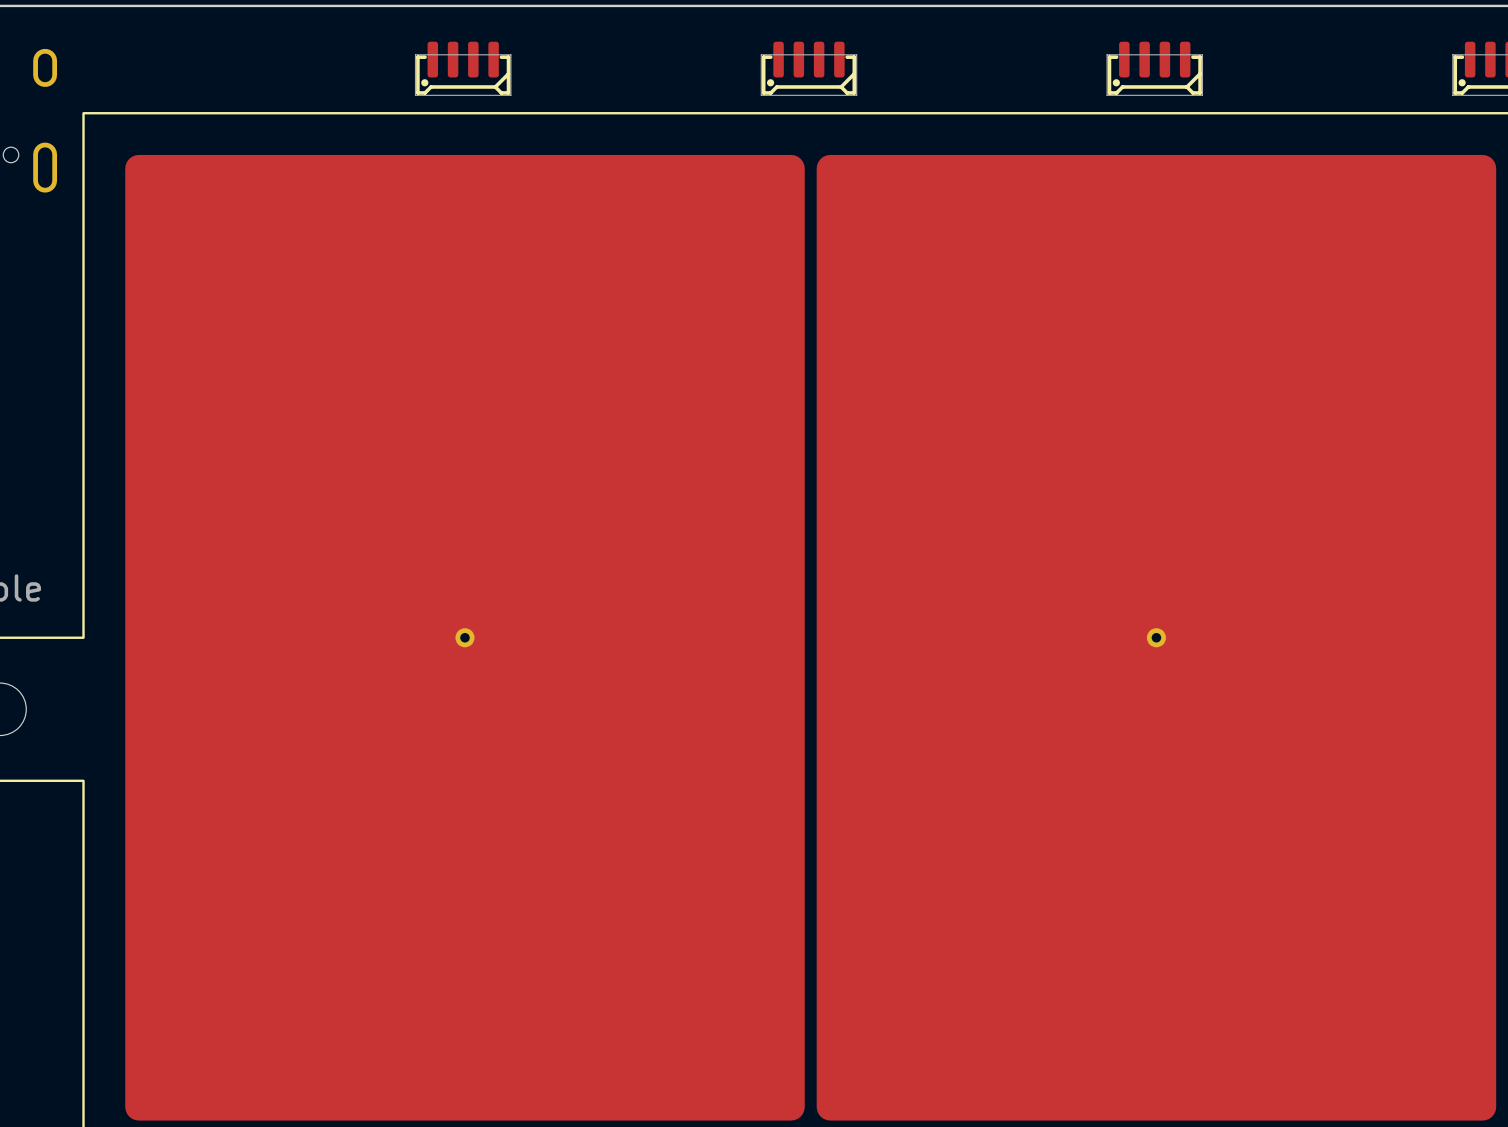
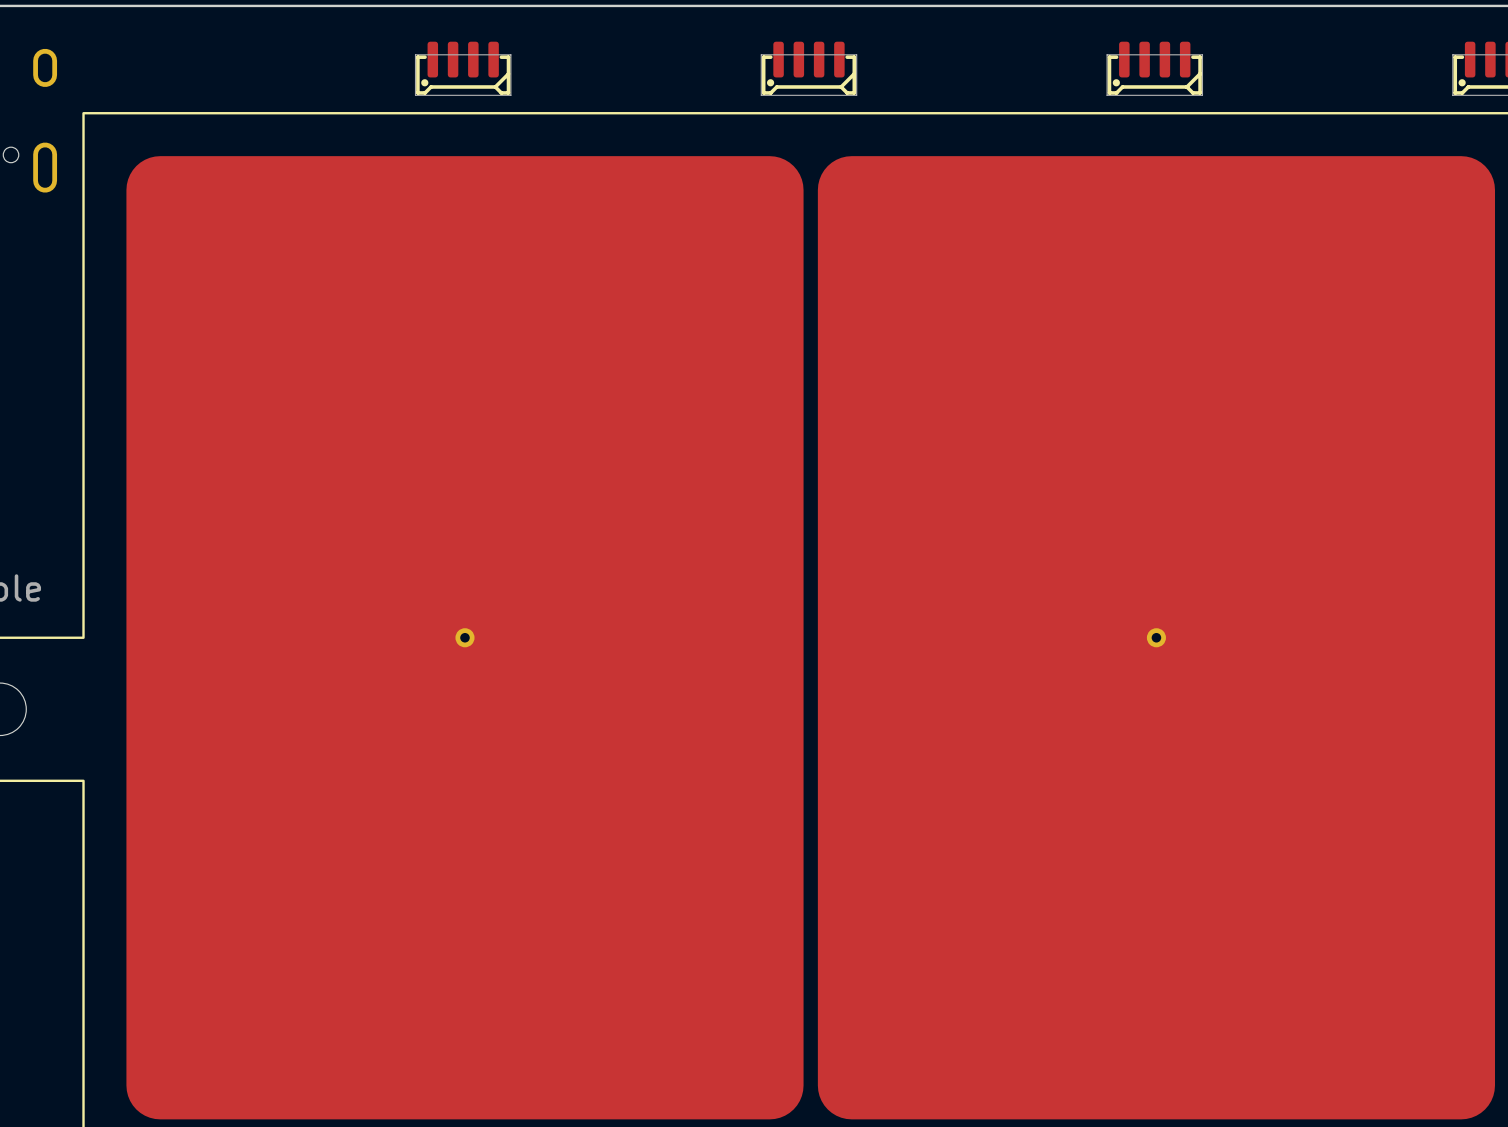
part footprint: [125, 154, 805, 1121] -> [126, 156, 804, 1120]
part footprint: [816, 154, 1497, 1121] -> [817, 156, 1495, 1120]

